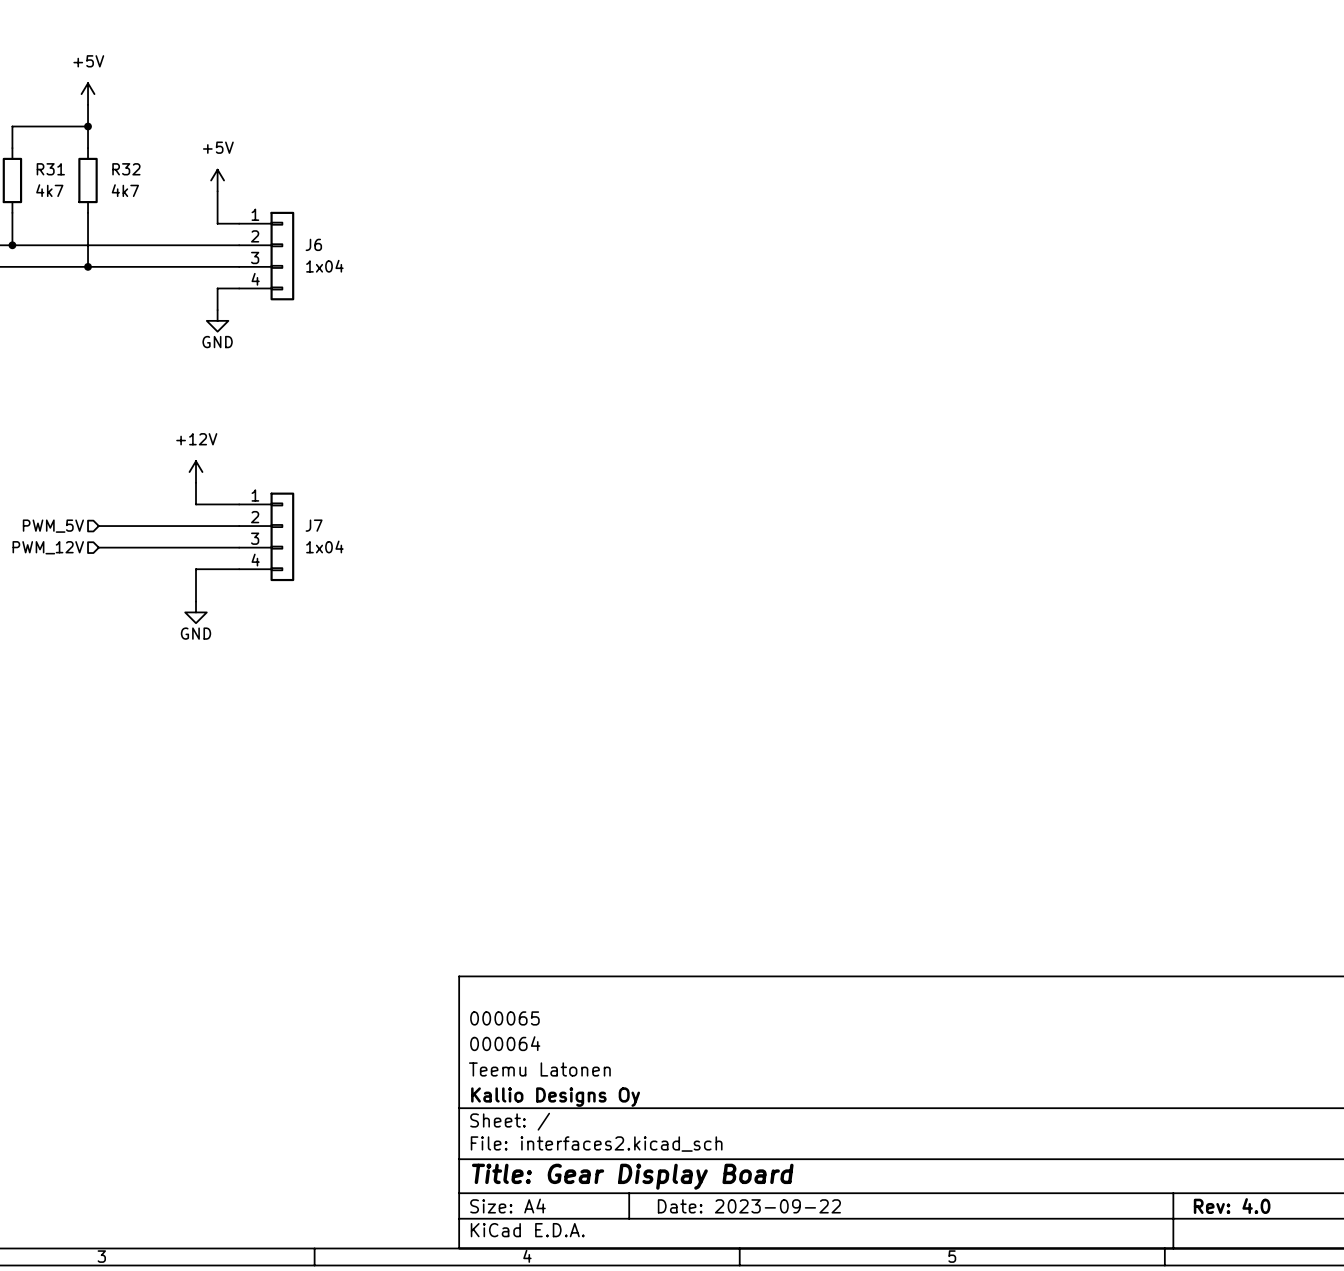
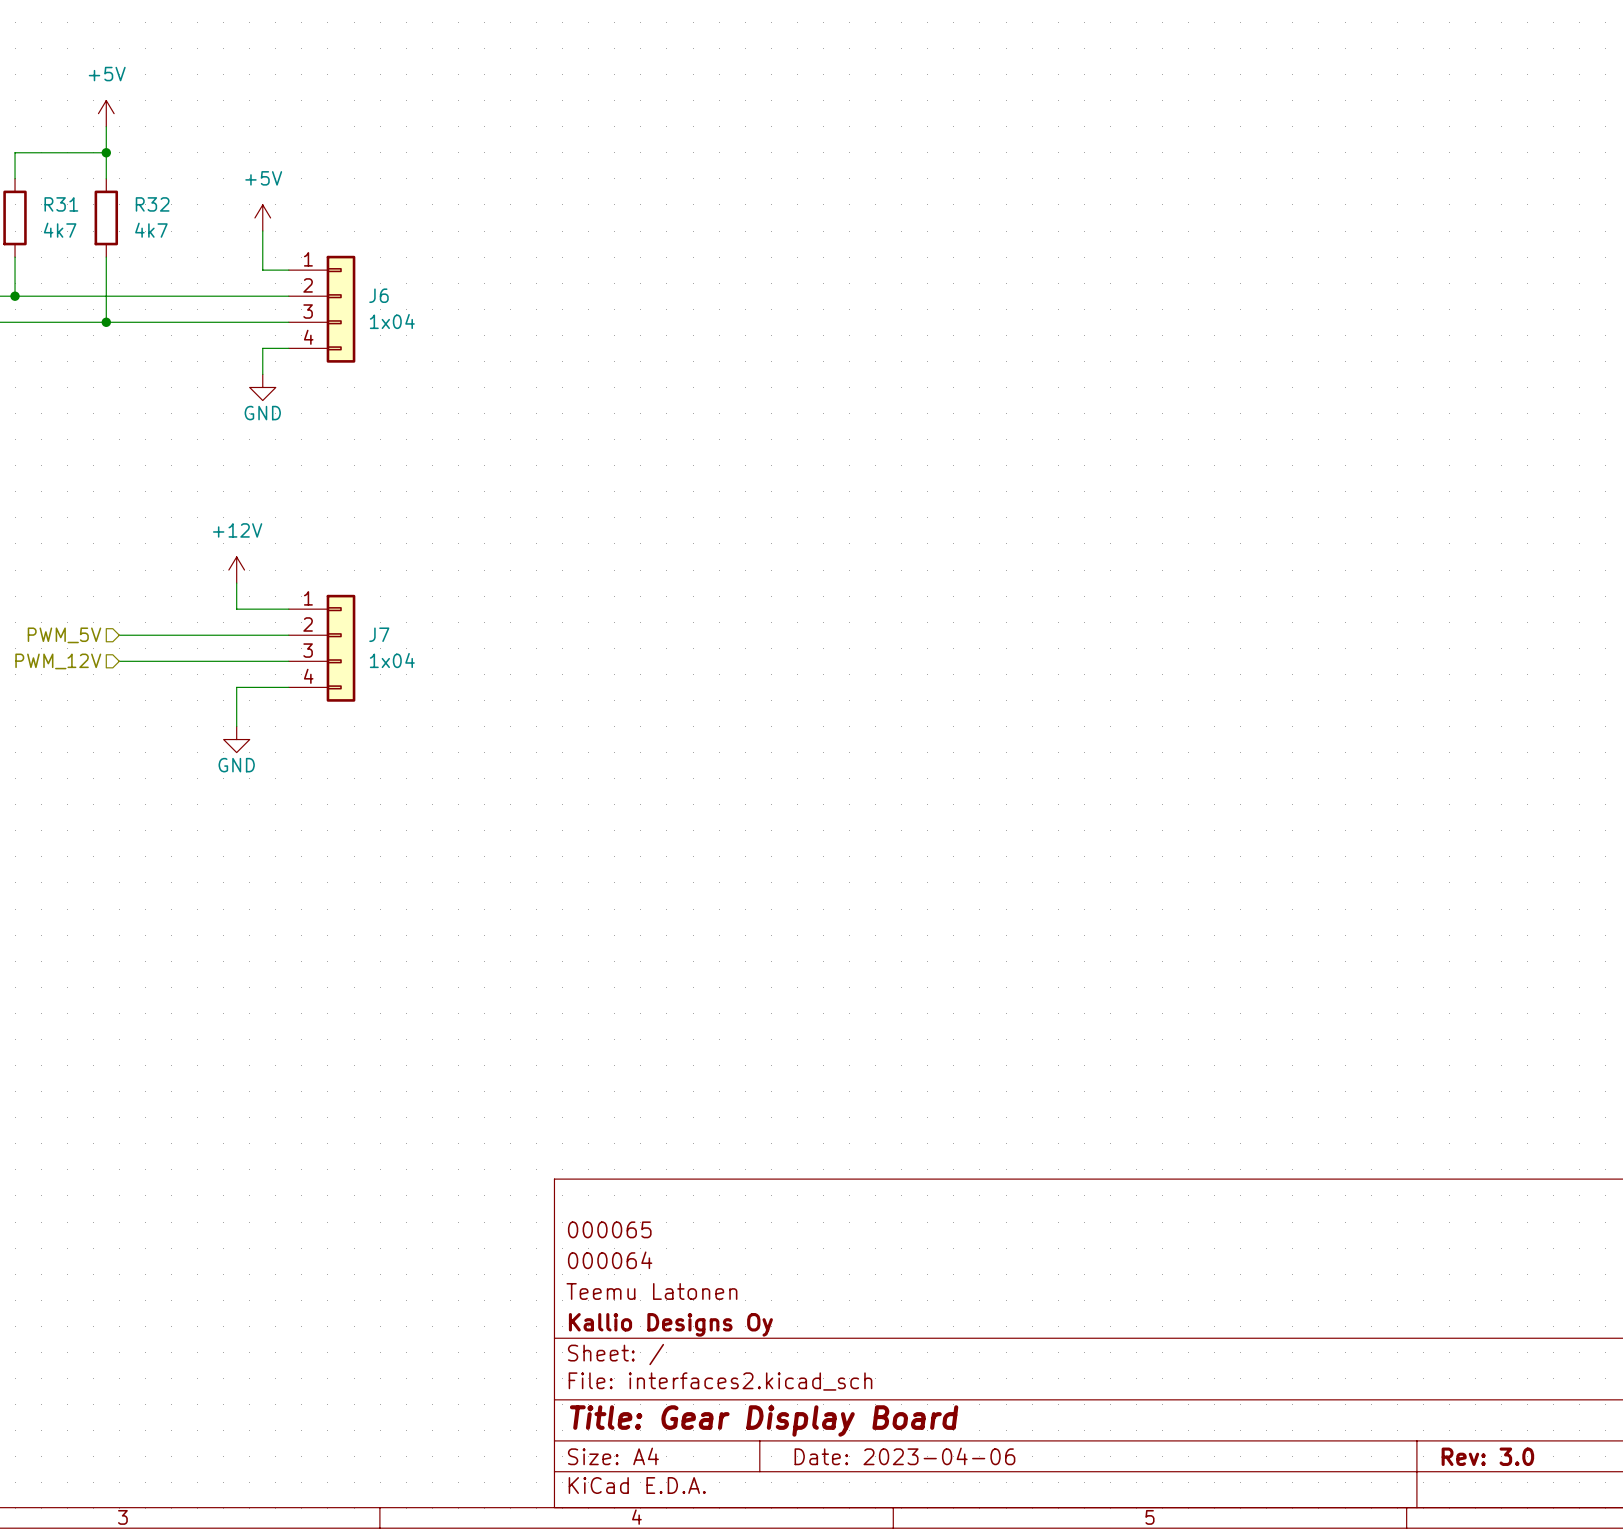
title block: Date: 2023-09-22 (749, 1206) -> Date: 2023-04-06 (904, 1456)
title block: Rev: 4.0 (1232, 1206) -> Rev: 3.0 (1487, 1456)

